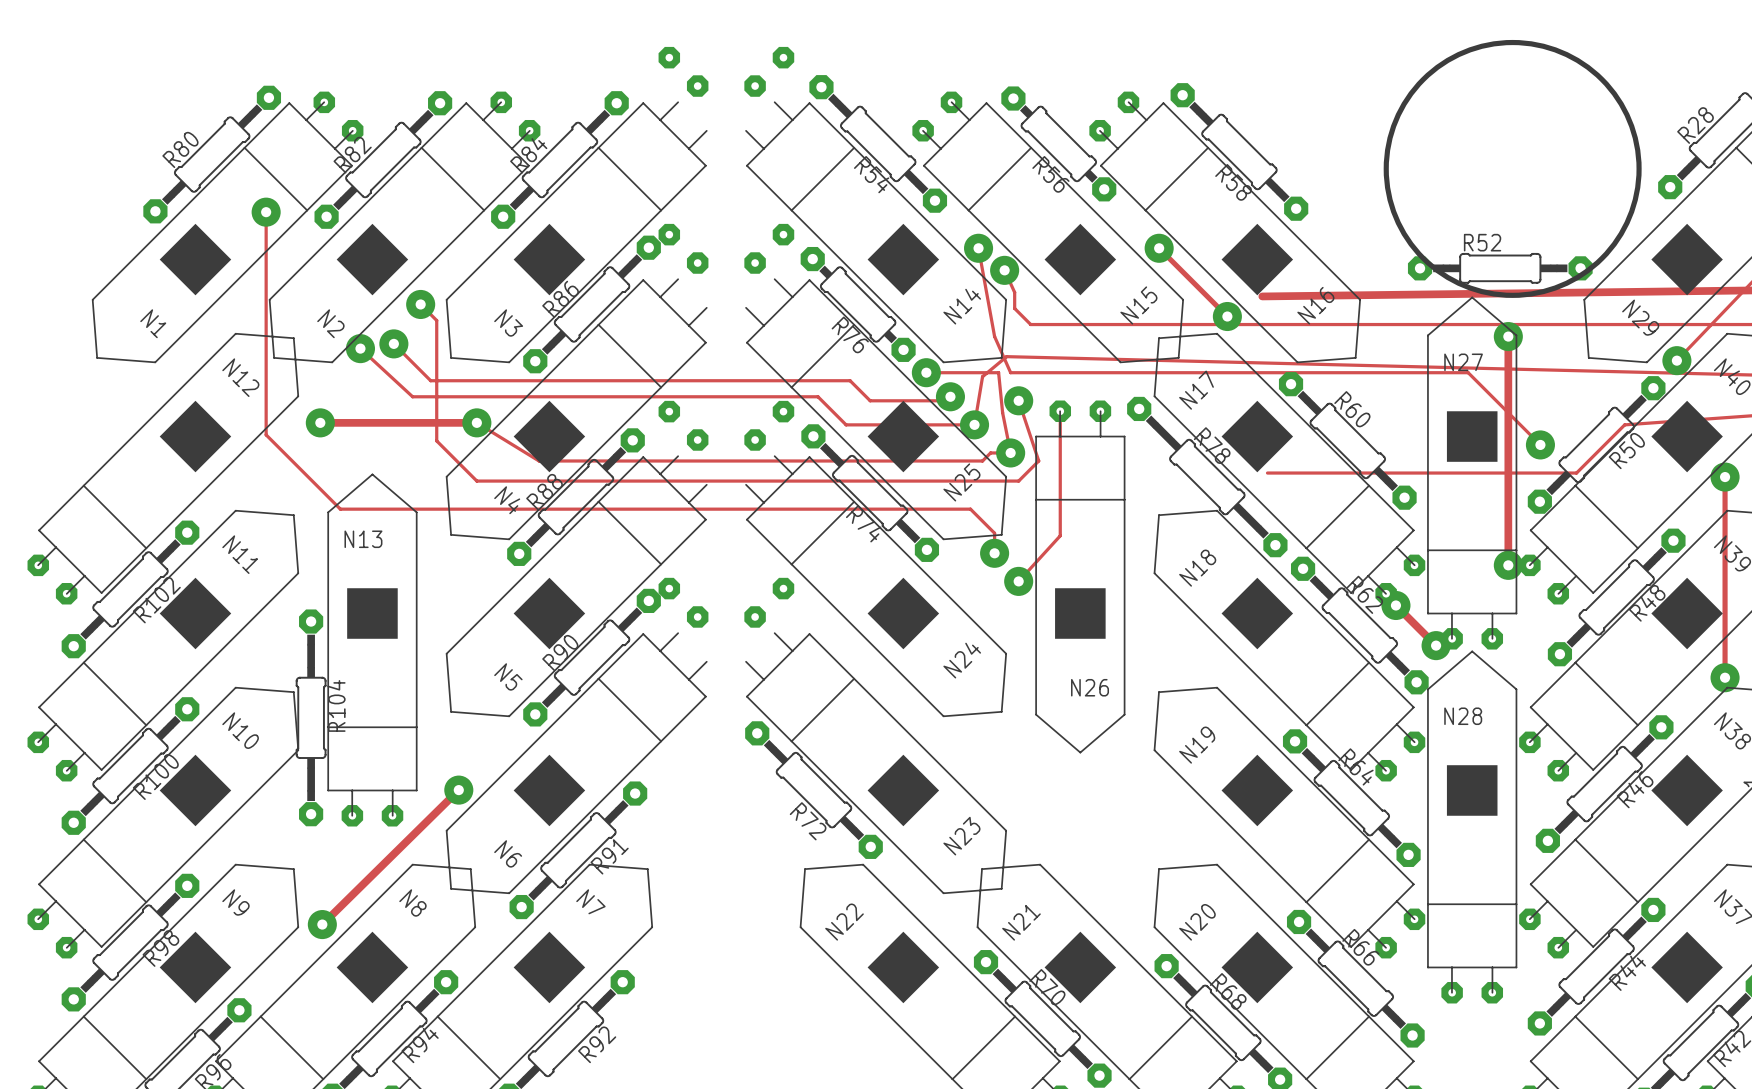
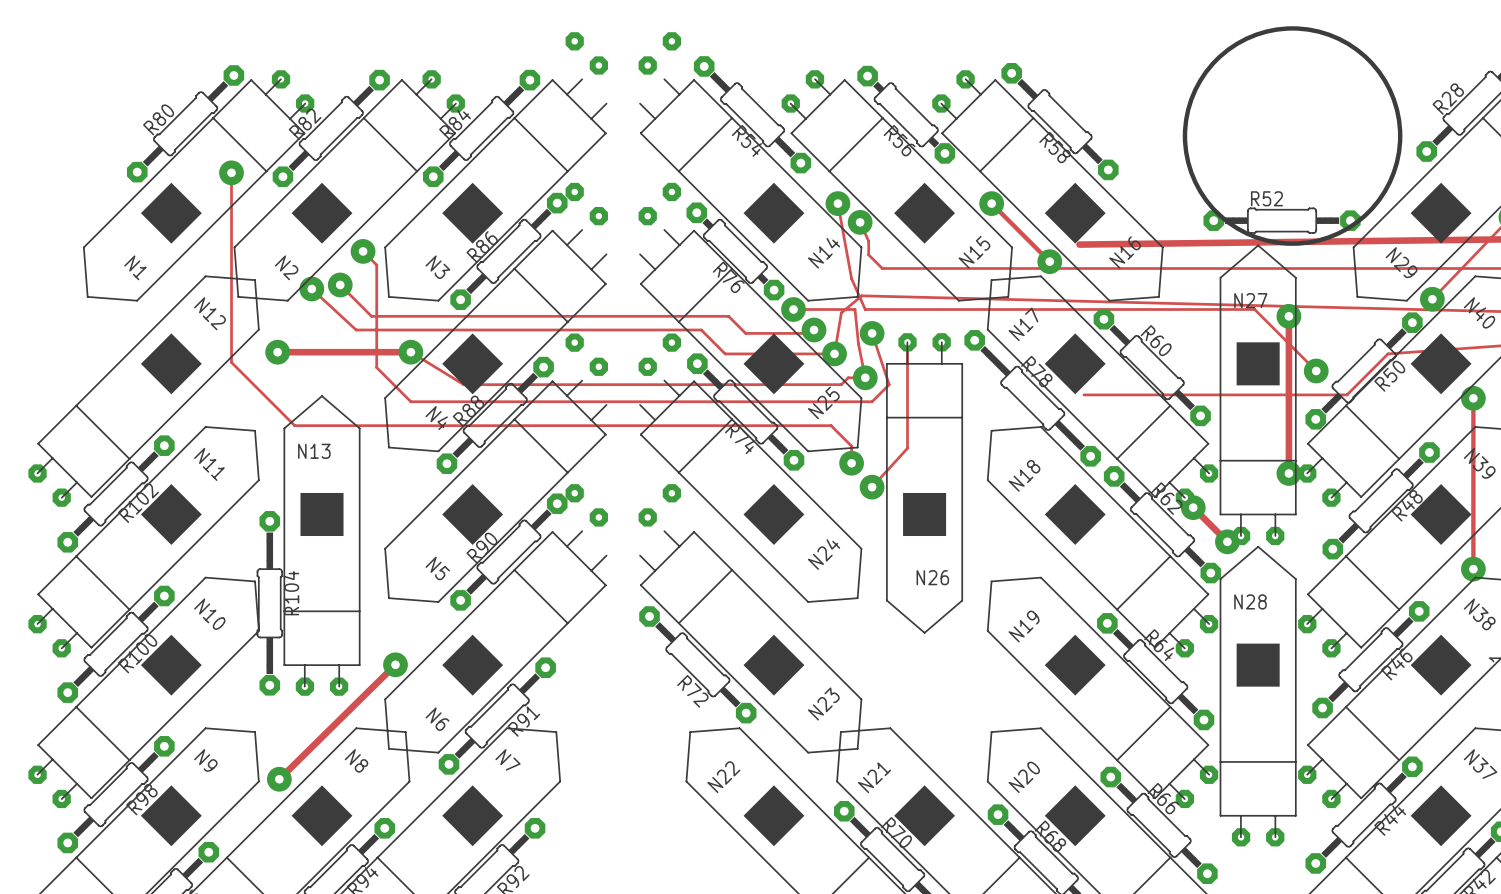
track: (1508, 336) (1508, 380) -> none
via position: (1508, 336) -> (1288, 316)

